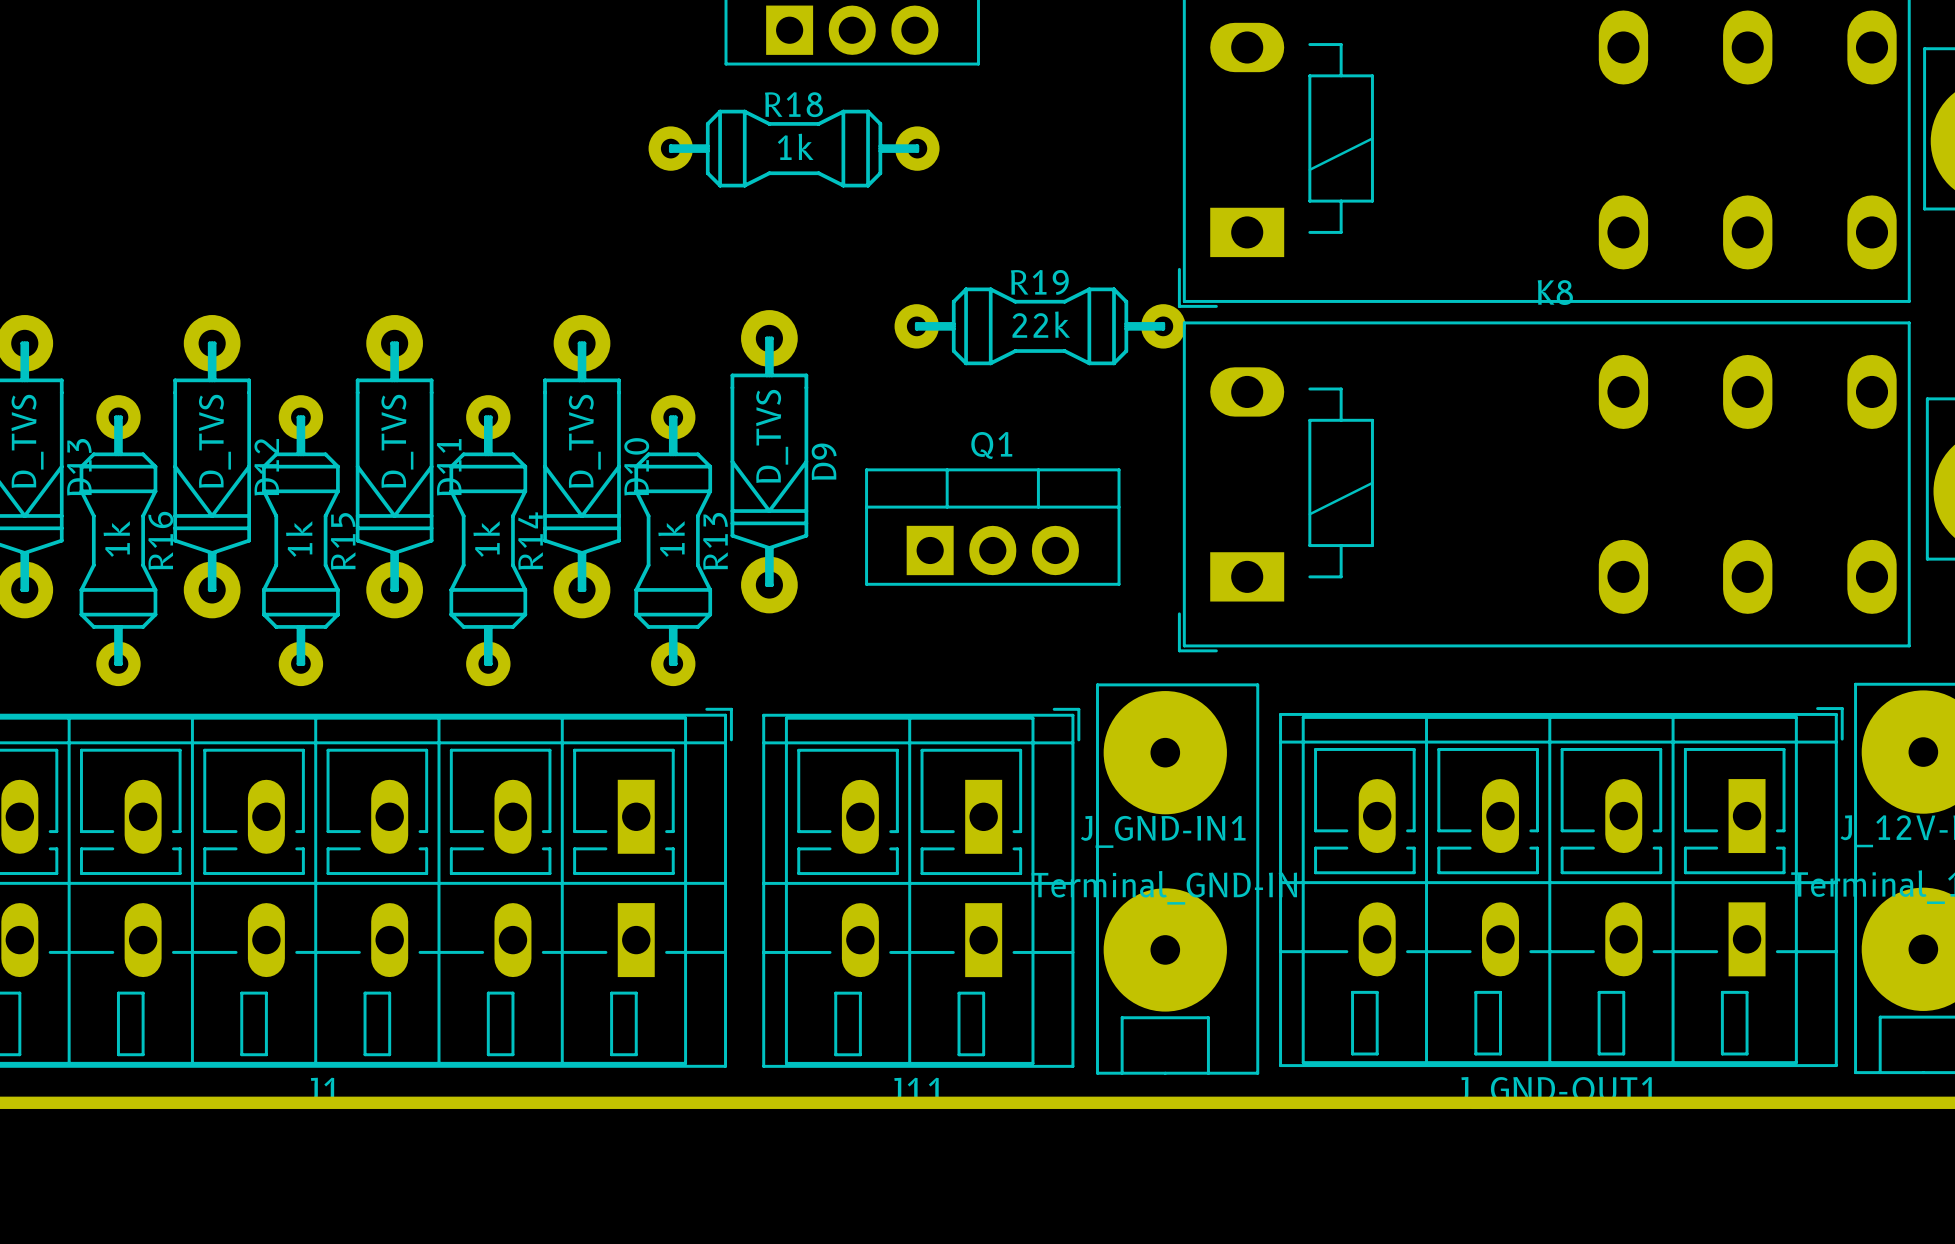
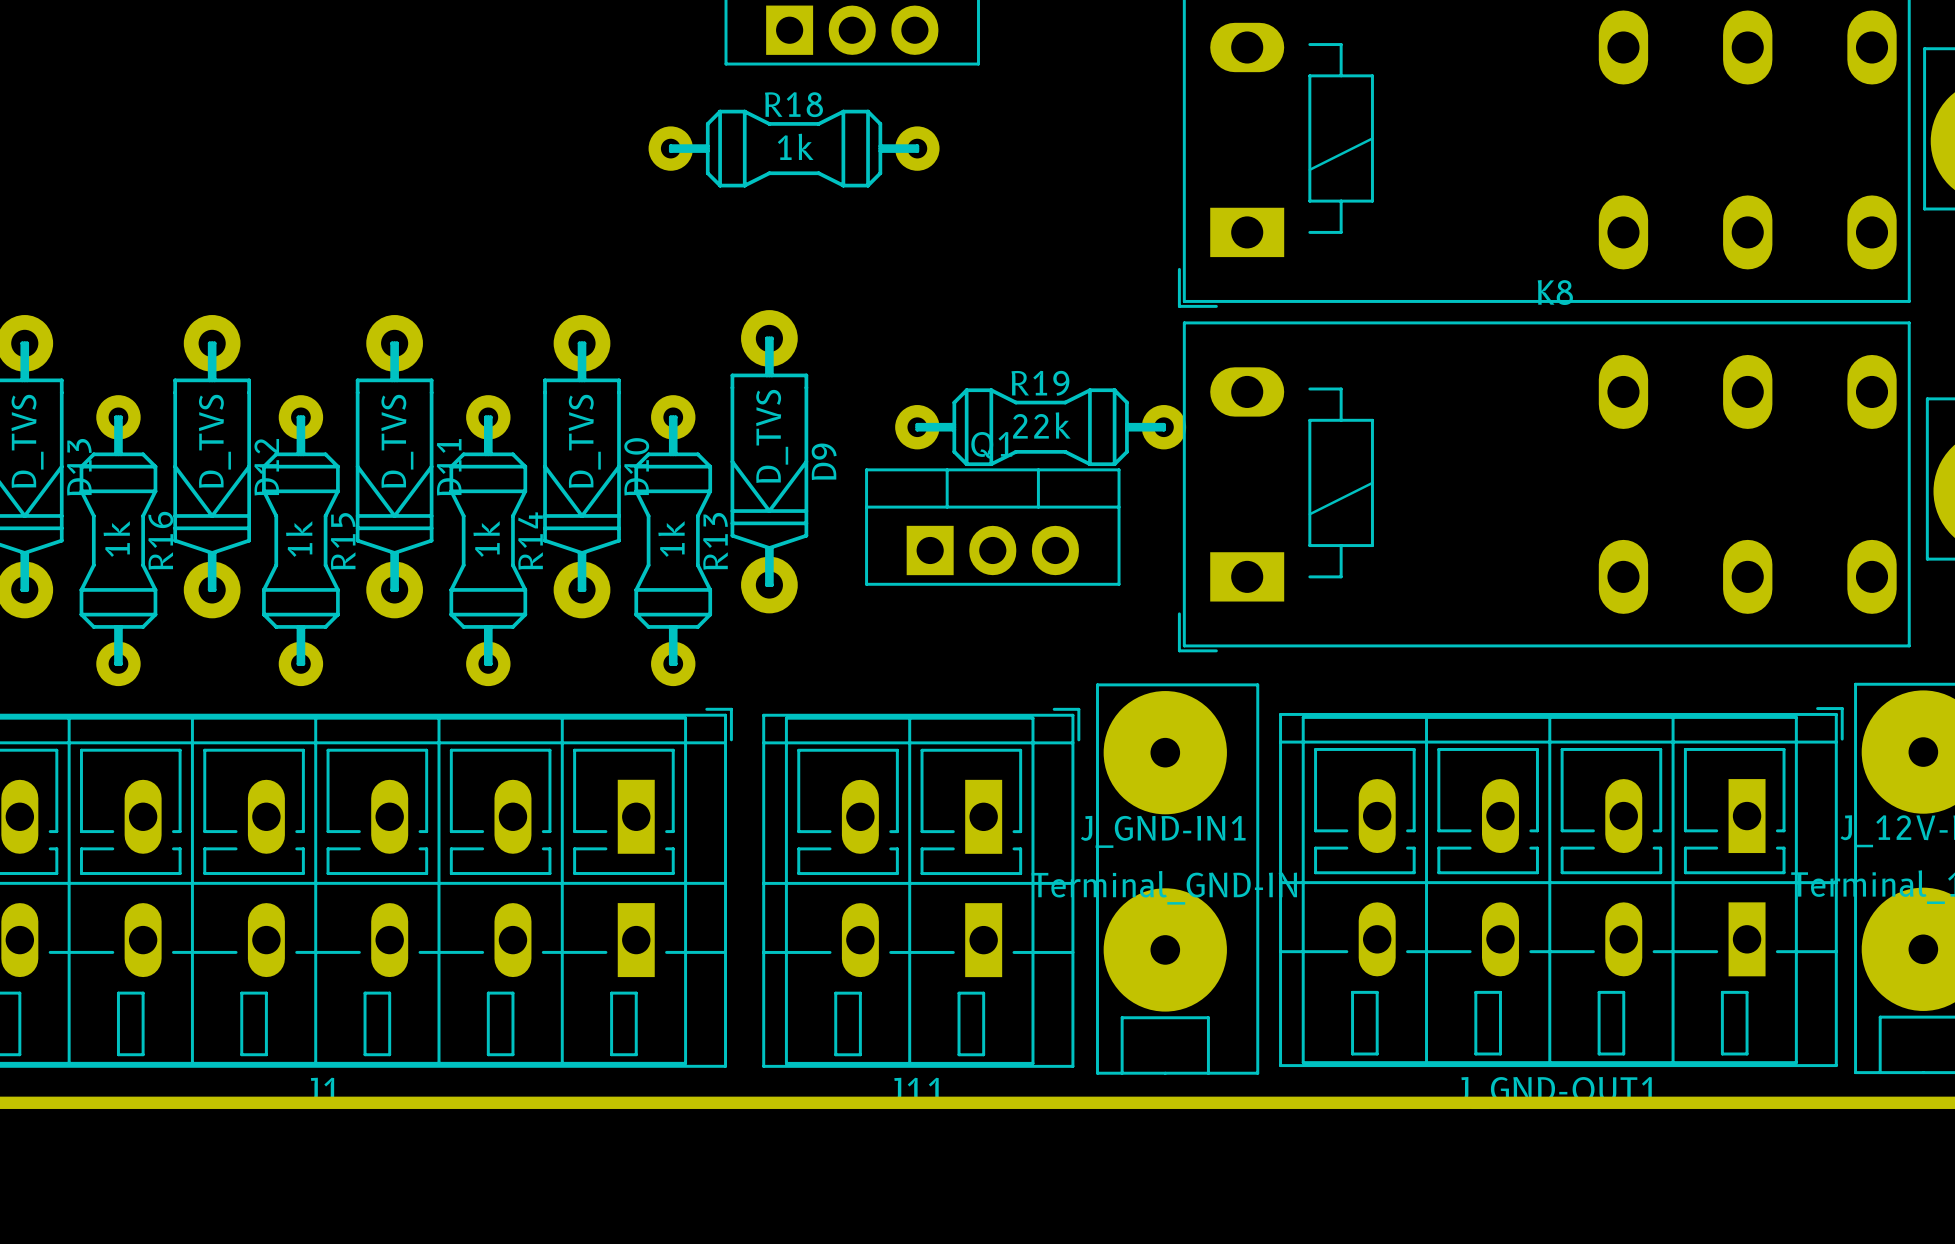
R19 position: (1040, 326) -> (1040, 427)

